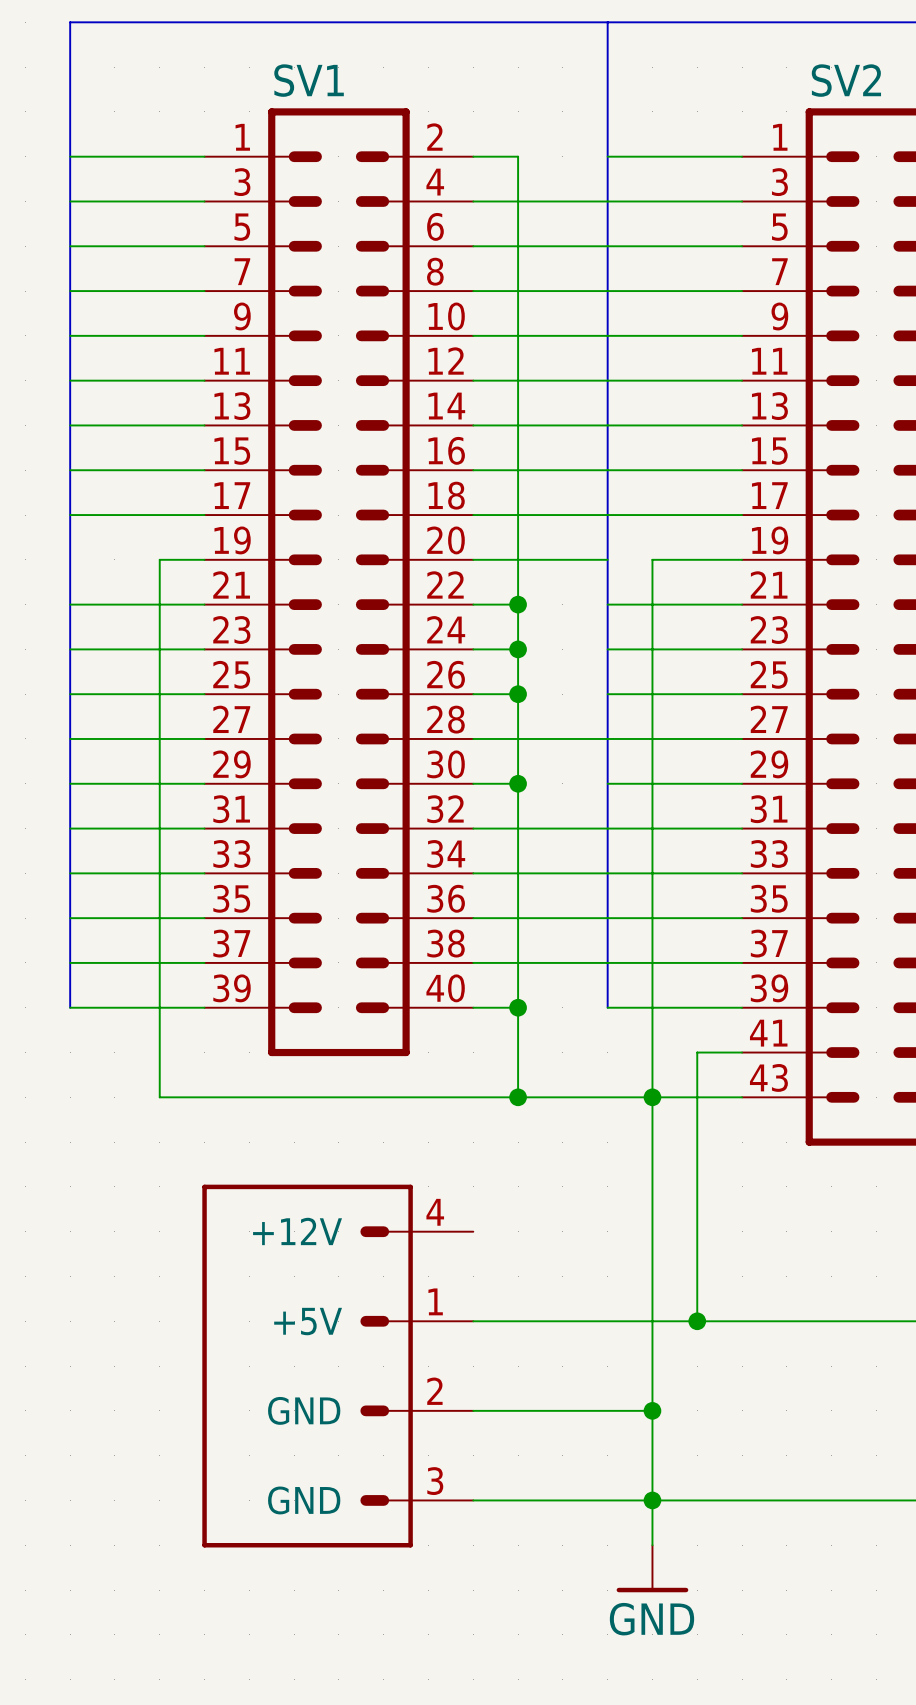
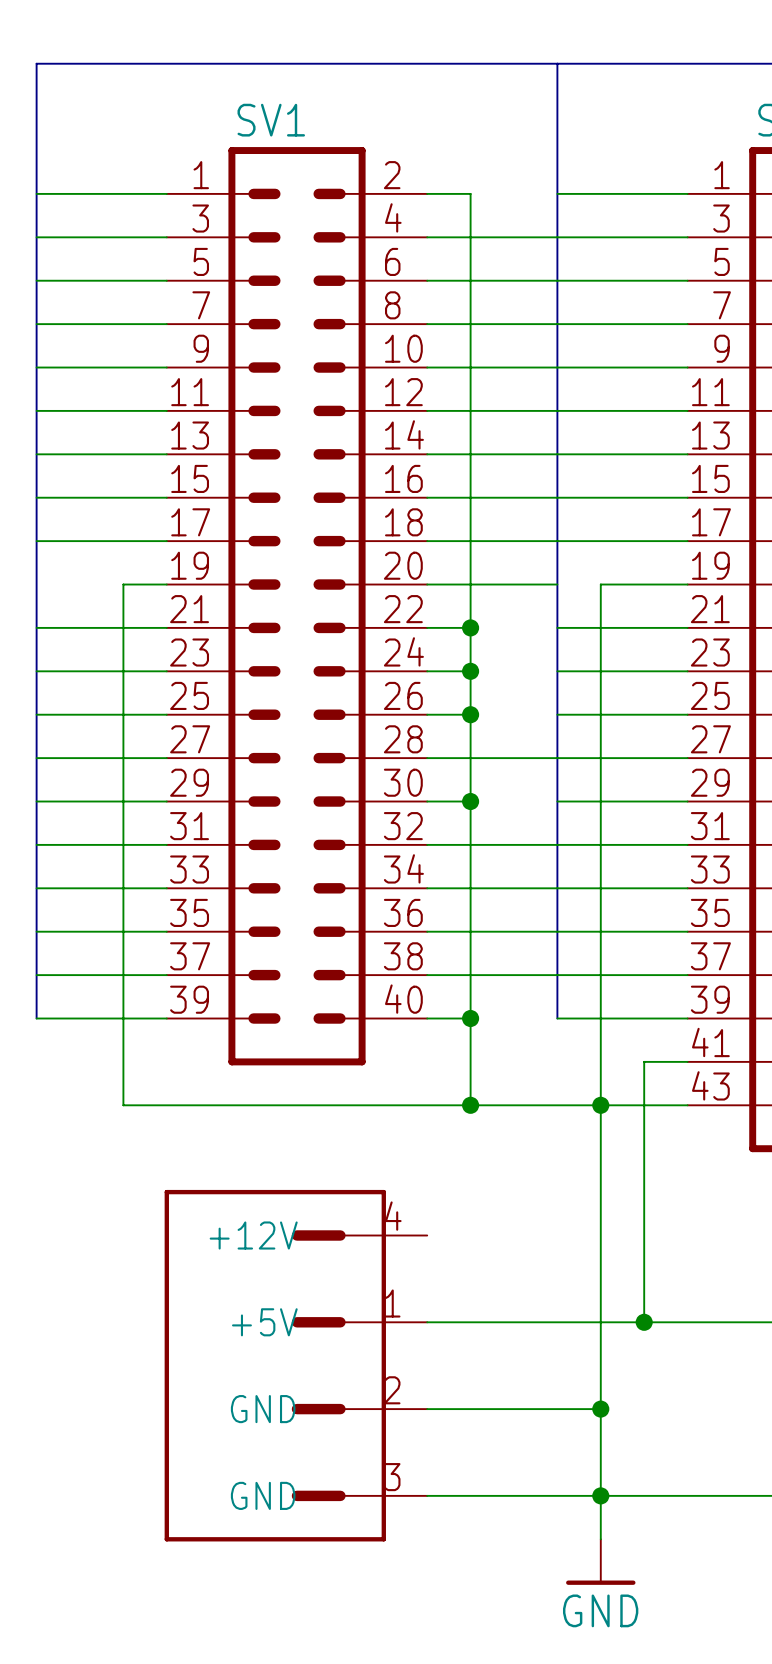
part symbol: [202, 1184, 474, 1548] -> [164, 1189, 428, 1542]

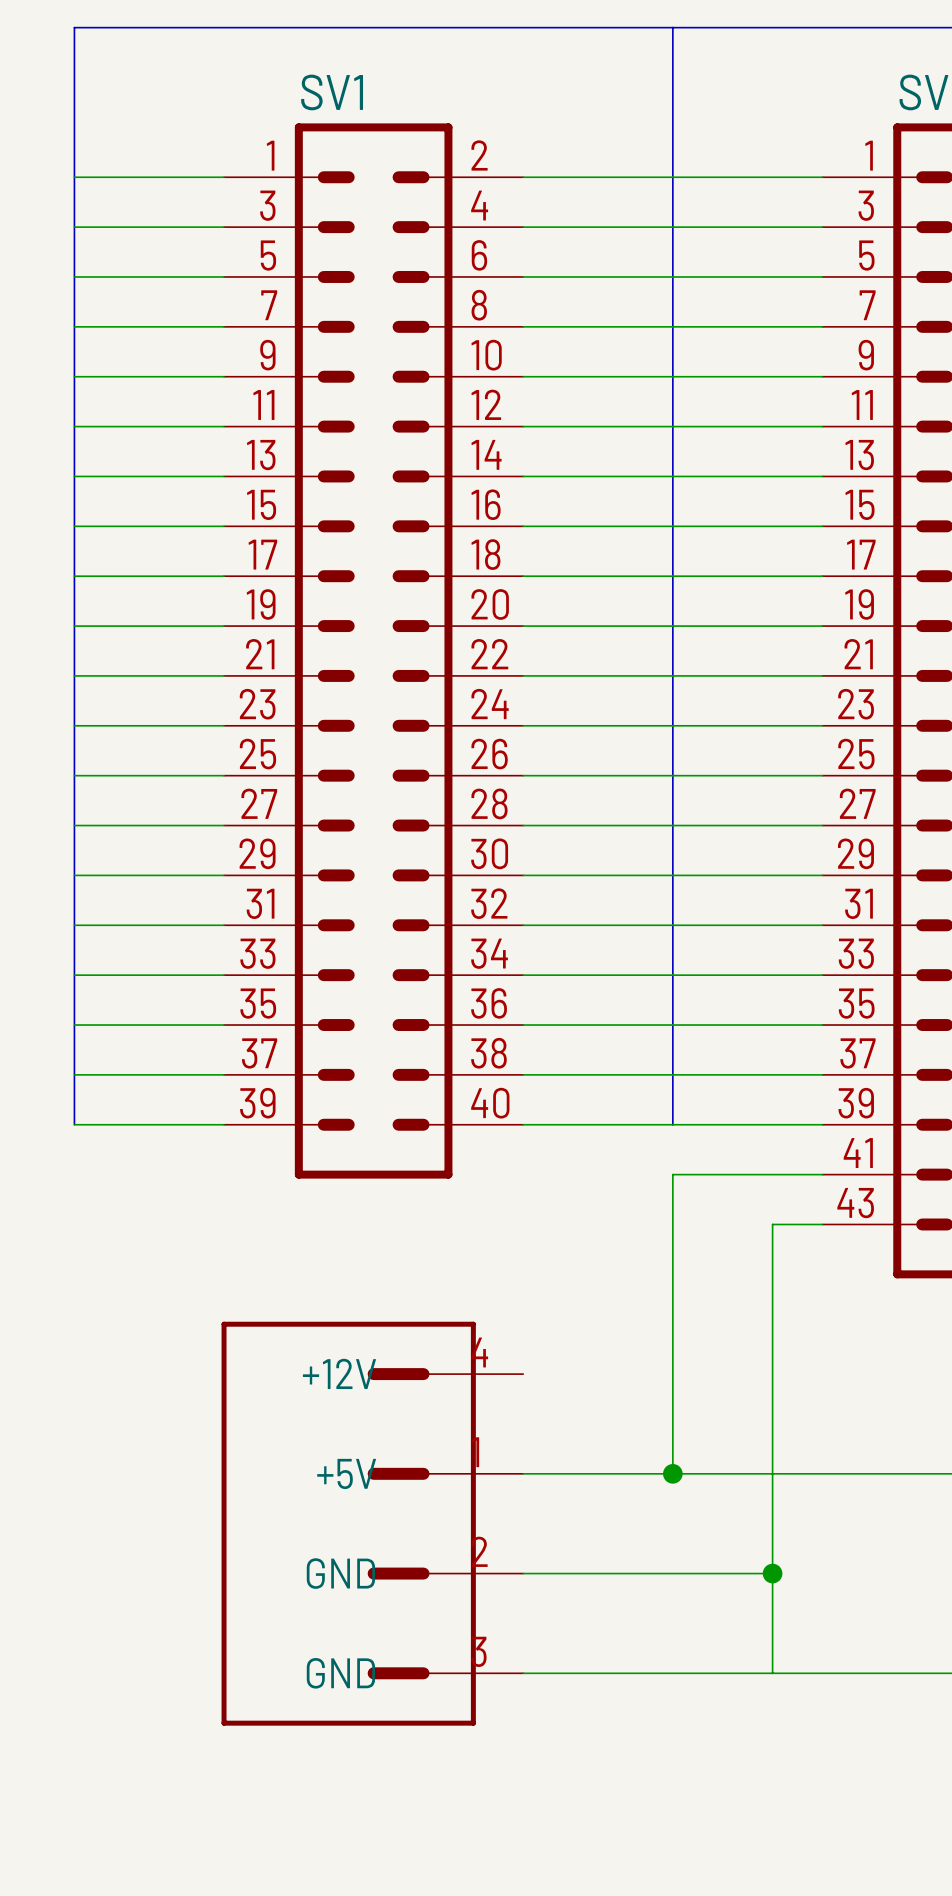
wire: (470, 193) (470, 1105) -> (573, 177) (672, 177)
wire: (123, 584) (123, 1105) (644, 1105) (644, 1061) -> (174, 626) (74, 626)
wire: (600, 584) (600, 1539) -> (722, 626) (672, 626)
wire: none -> (573, 675) (672, 675)
junction: (470, 627) -> none
wire: none -> (573, 725) (672, 725)
junction: (470, 671) -> none
wire: none -> (573, 775) (672, 775)
junction: (470, 714) -> none
wire: none -> (573, 875) (672, 875)
junction: (470, 801) -> none
wire: none -> (573, 1124) (672, 1124)
junction: (470, 1018) -> none
wire: none -> (772, 1174) (672, 1174) (672, 1473)
junction: (470, 1105) -> none
junction: (600, 1105) -> none
junction: none -> (672, 1473)
wire: none -> (772, 1473) (772, 1673)
junction: (644, 1322) -> none
wire: none -> (722, 1573) (772, 1573)
junction: (600, 1409) -> none
junction: none -> (772, 1573)
junction: (600, 1495) -> none
power symbol: GND (600, 1562) -> none

